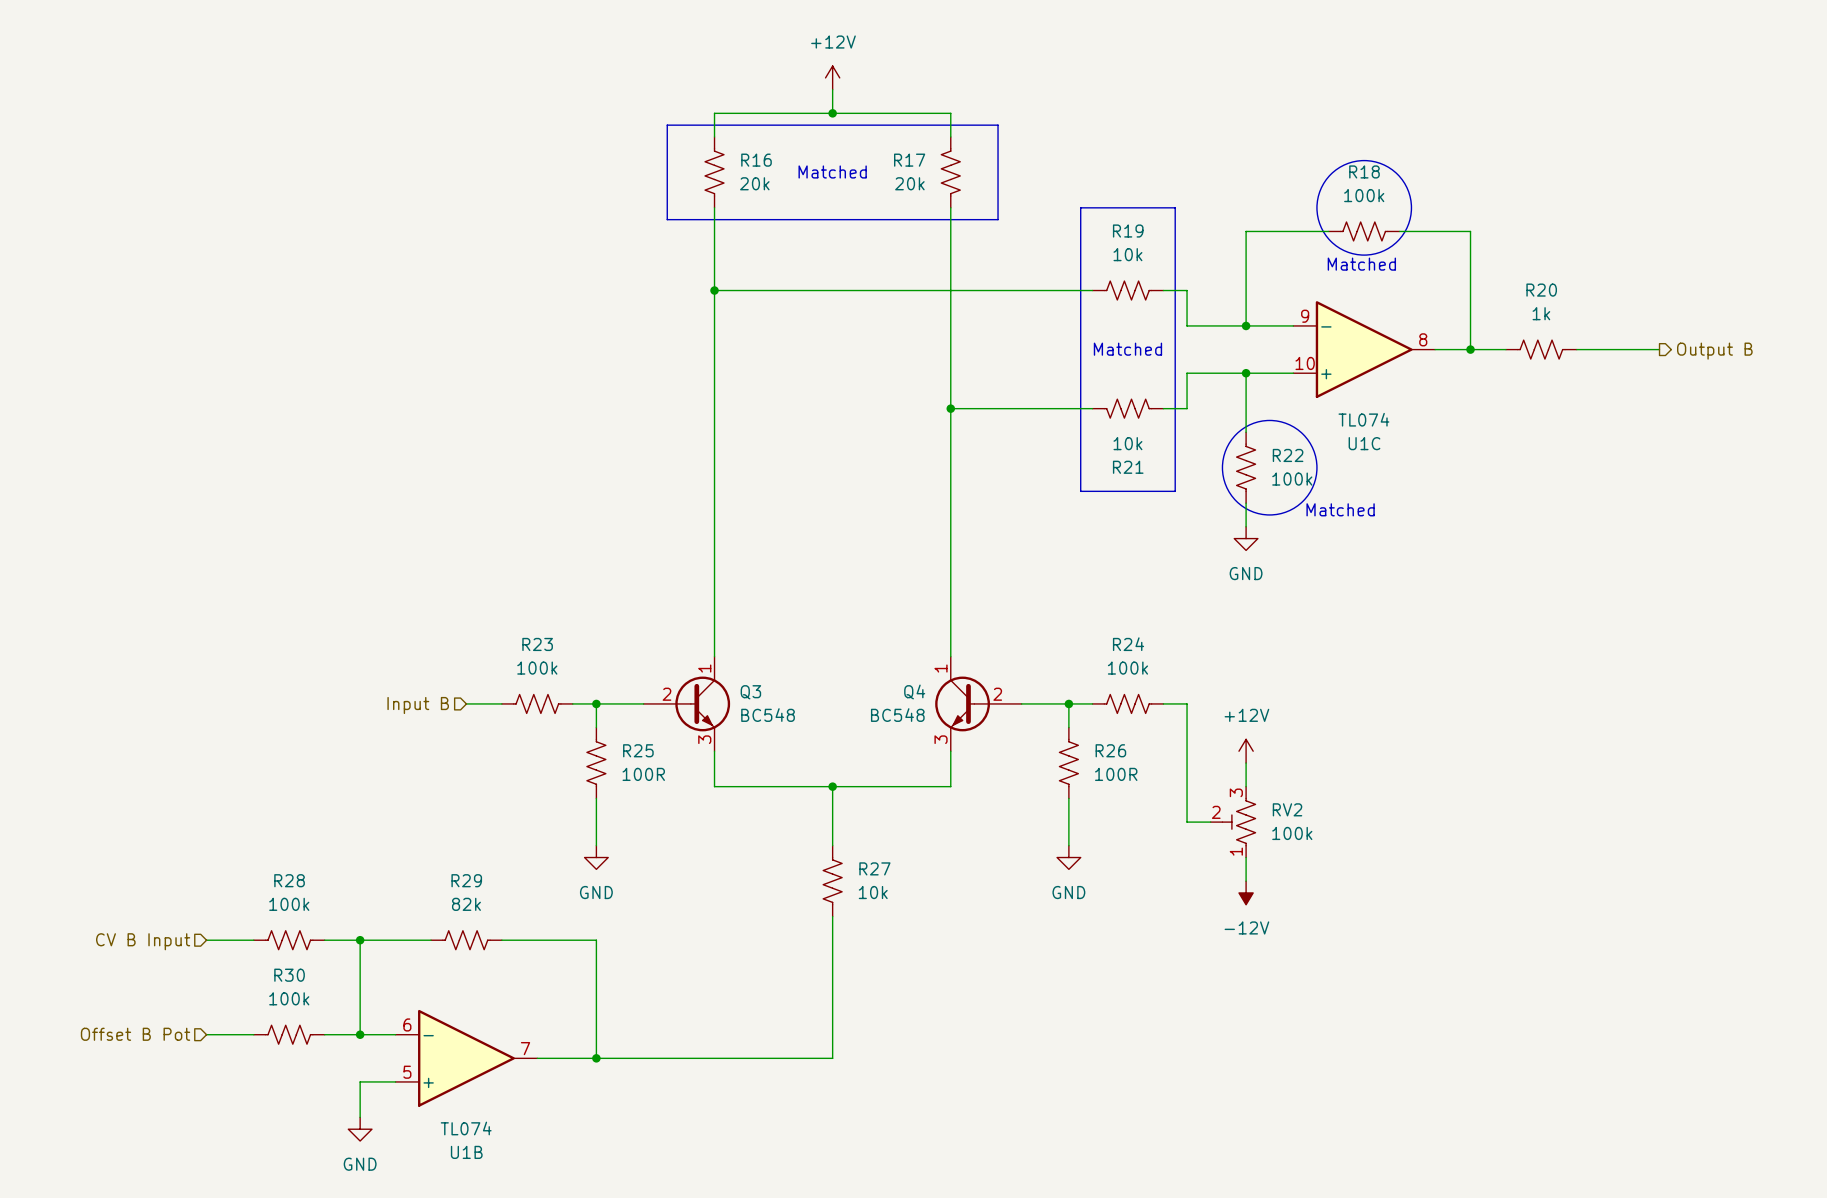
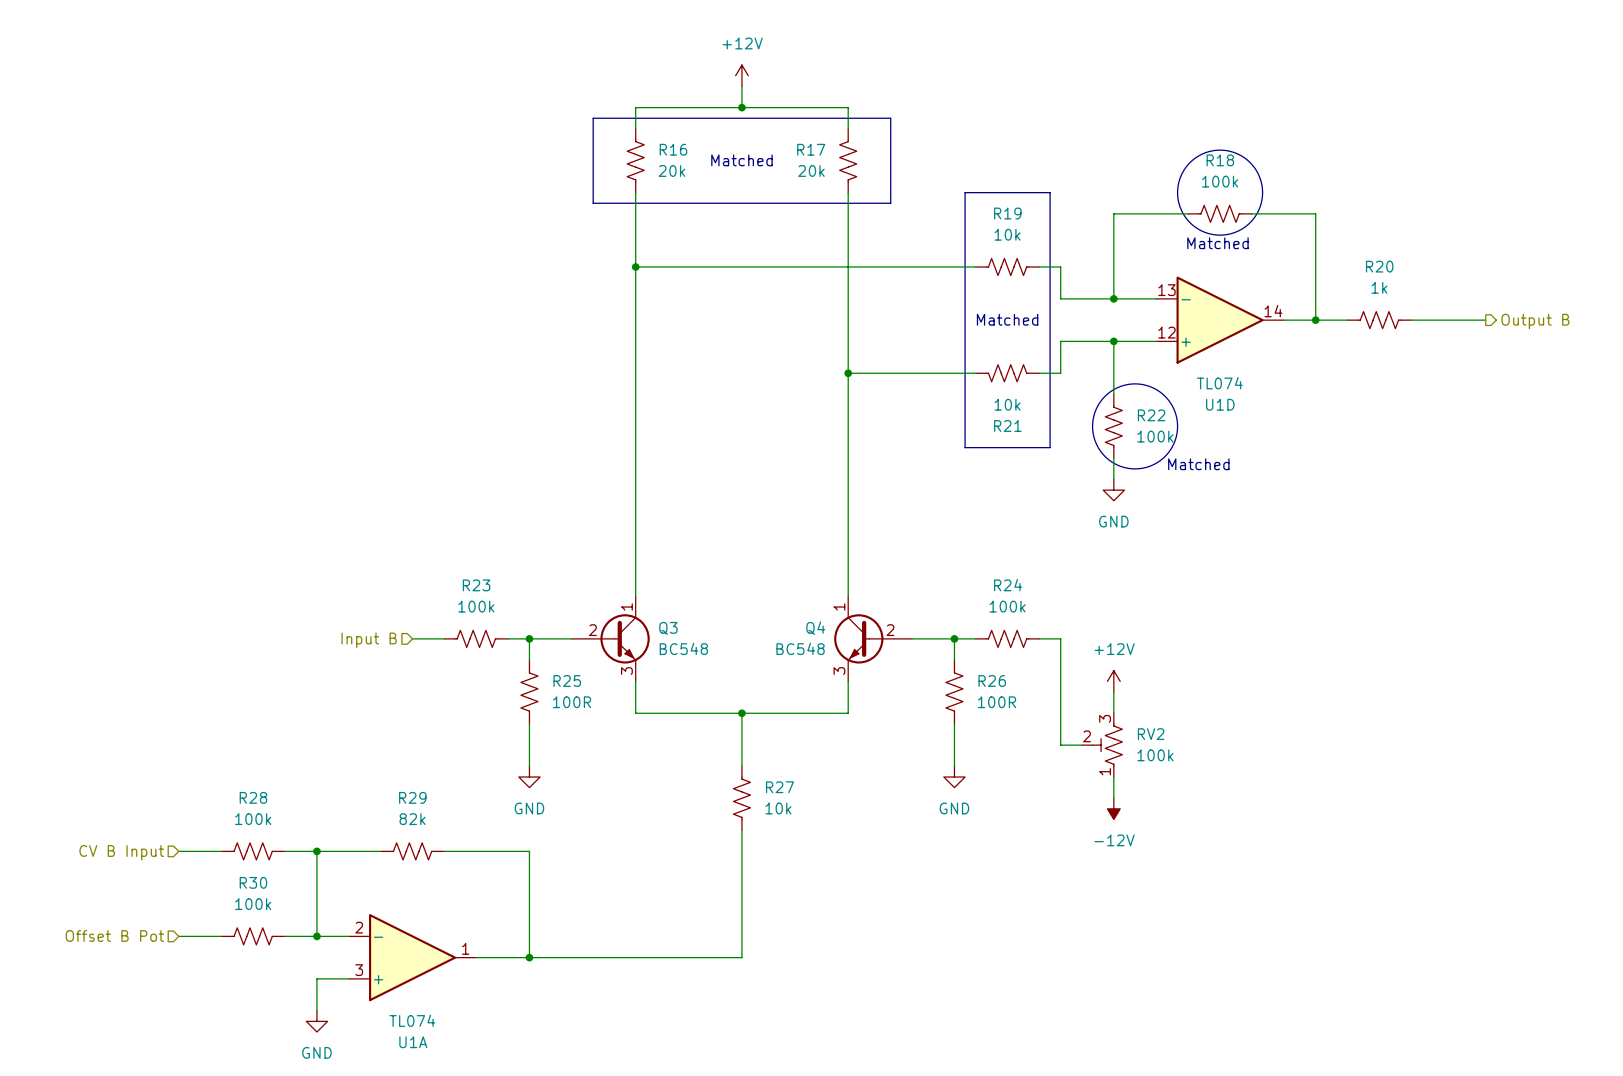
U1C pin number: 9 (1305, 316) -> 13 (1166, 290)
U1C pin number: 8 (1423, 339) -> 14 (1273, 311)
U1C pin number: 10 (1305, 363) -> 12 (1166, 332)
U1C name: U1C (1364, 443) -> U1D (1220, 404)
U1B pin number: 6 (407, 1024) -> 2 (359, 927)
U1B pin number: 7 (525, 1048) -> 1 (465, 948)
U1B pin number: 5 (407, 1072) -> 3 (359, 970)
U1B name: U1B (466, 1152) -> U1A (413, 1042)

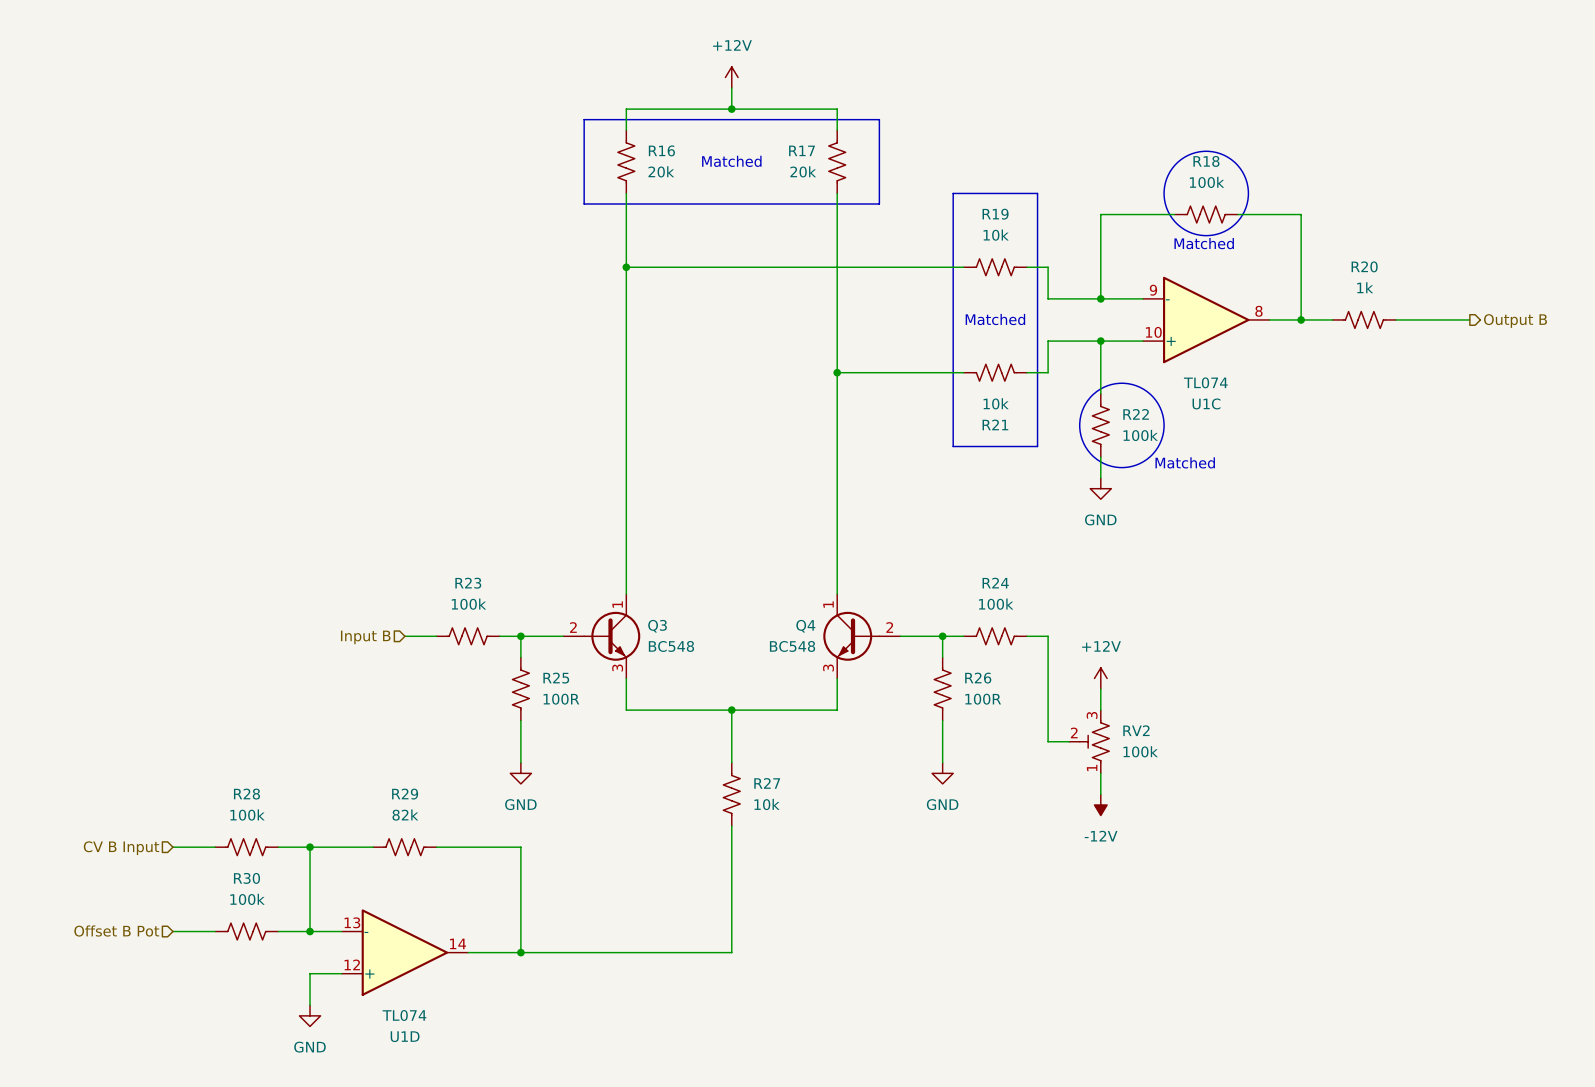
U1D position: (1220, 320) -> (404, 952)
U1C: none -> TL074 (1206, 319)
Q3 symbol: [571, 596, 650, 682] -> [563, 594, 641, 679]
Q4 symbol: [834, 596, 912, 682] -> [823, 594, 901, 679]
U1A: TL074 (412, 957) -> none

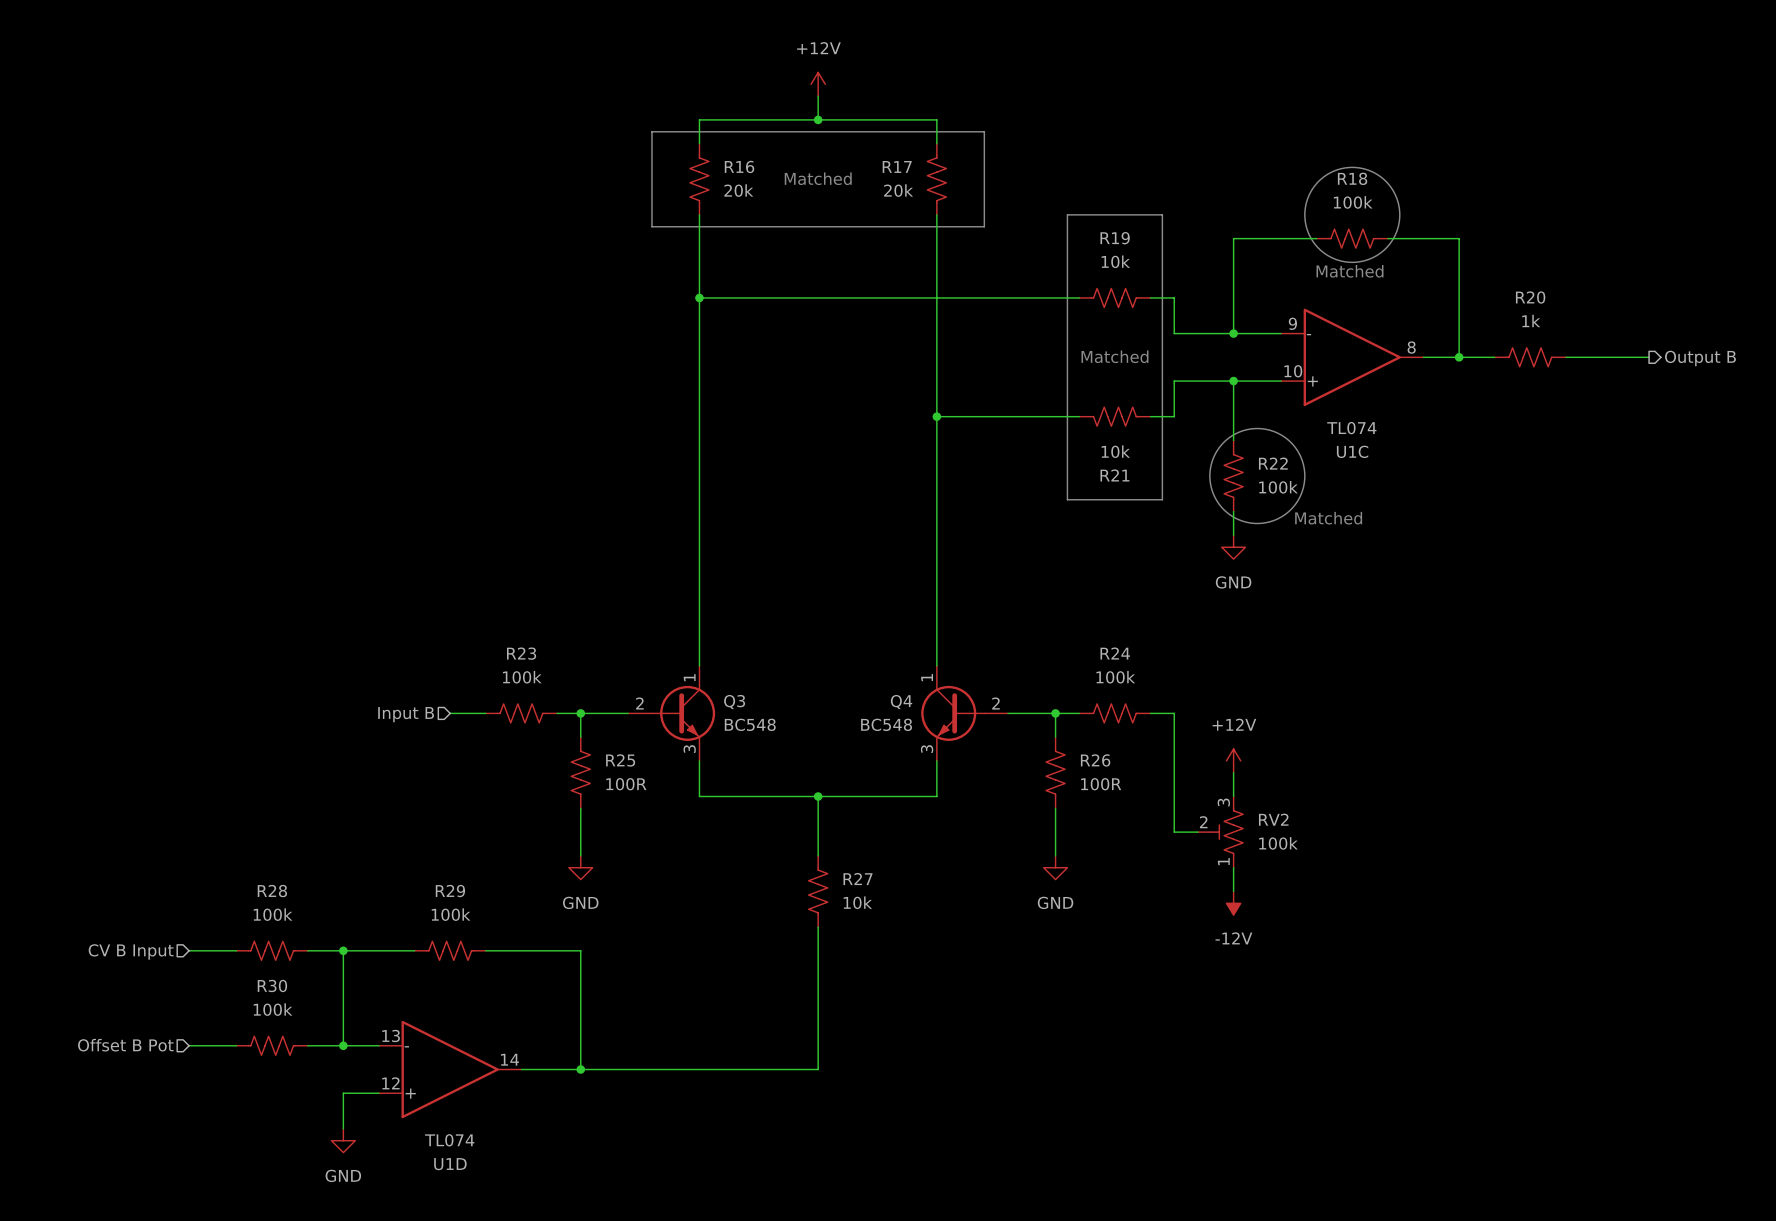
R29 value: 82k (405, 815) -> 100k (451, 914)

